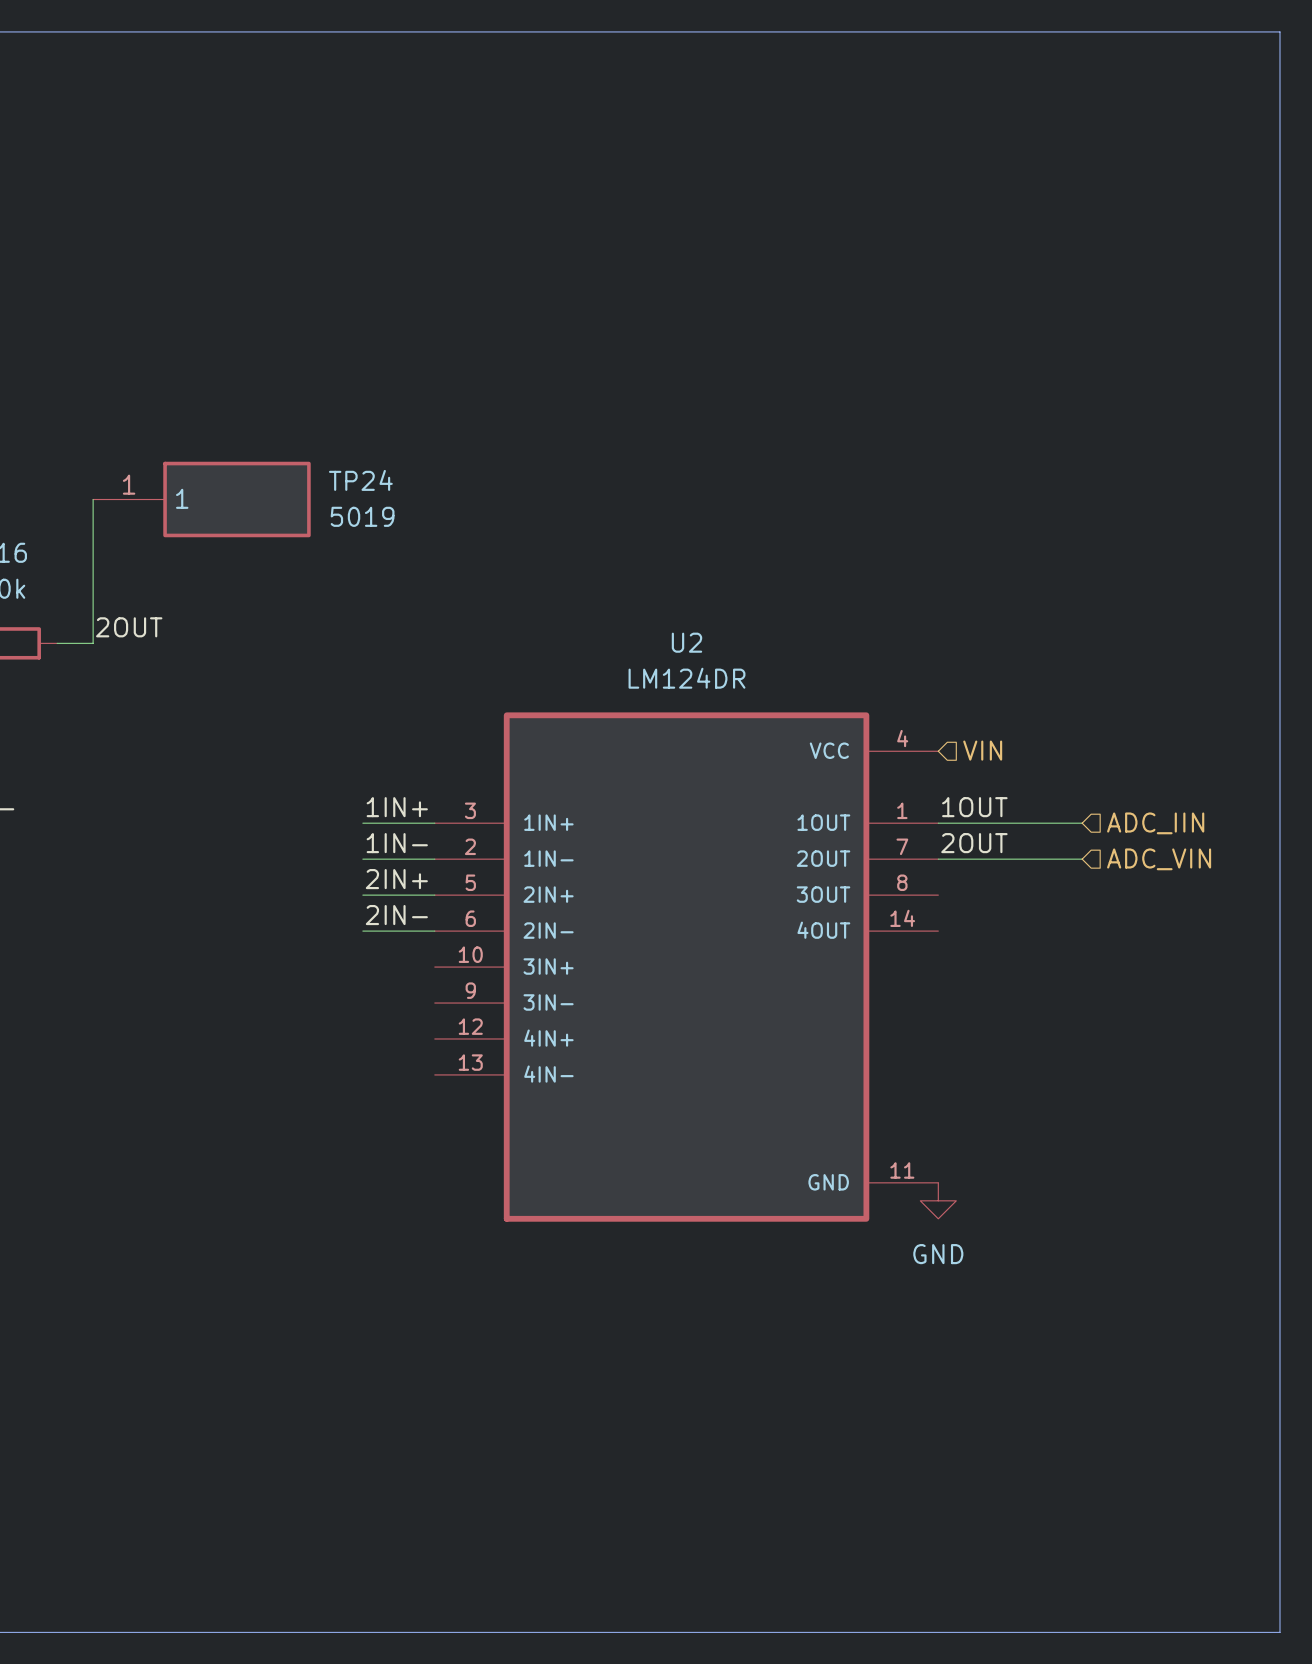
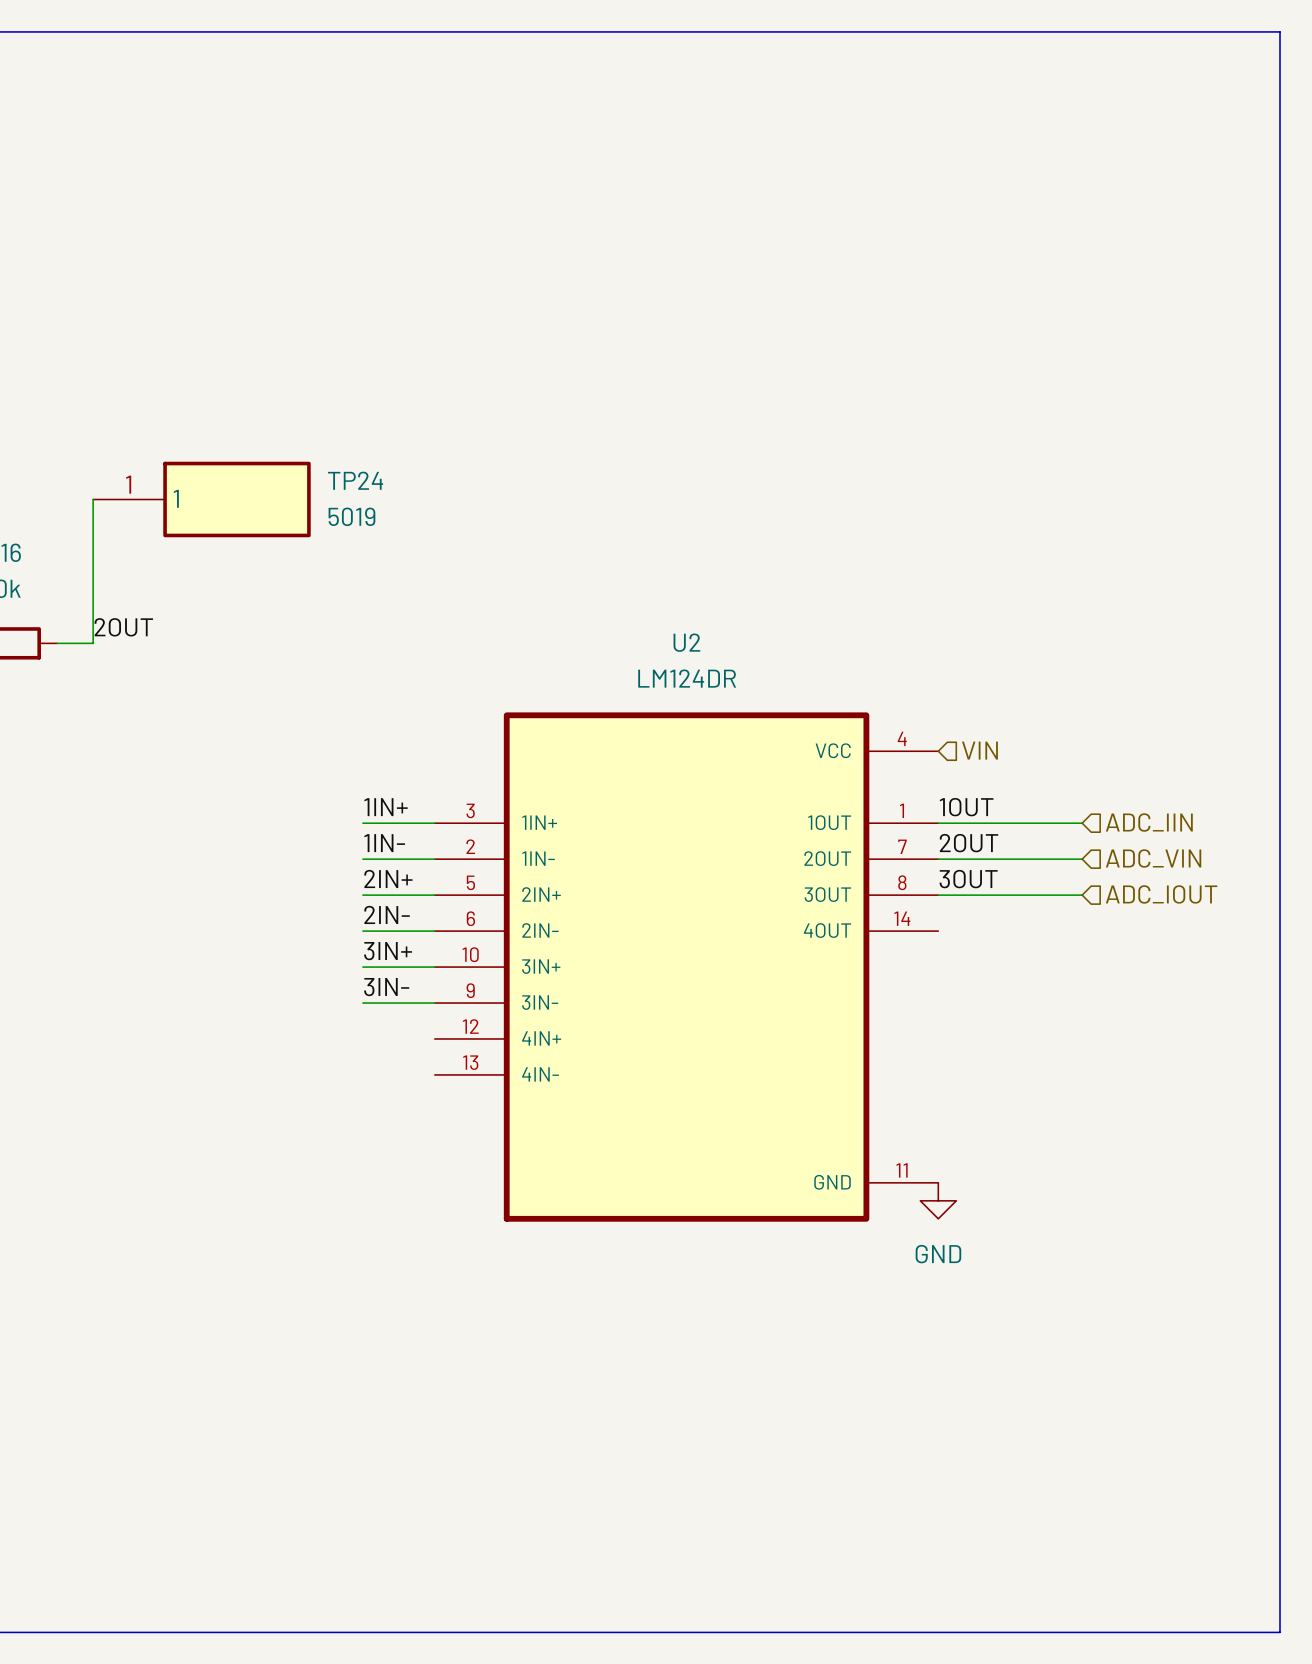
label: none -> 3OUT (968, 879)
wire: none -> (938, 895) (1082, 895)
hierarchical label: none -> ADC_IOUT (1161, 894)
label: none -> 3IN+ (388, 951)
wire: none -> (362, 967) (434, 967)
label: none -> 3IN- (386, 987)
wire: none -> (362, 1003) (434, 1003)

